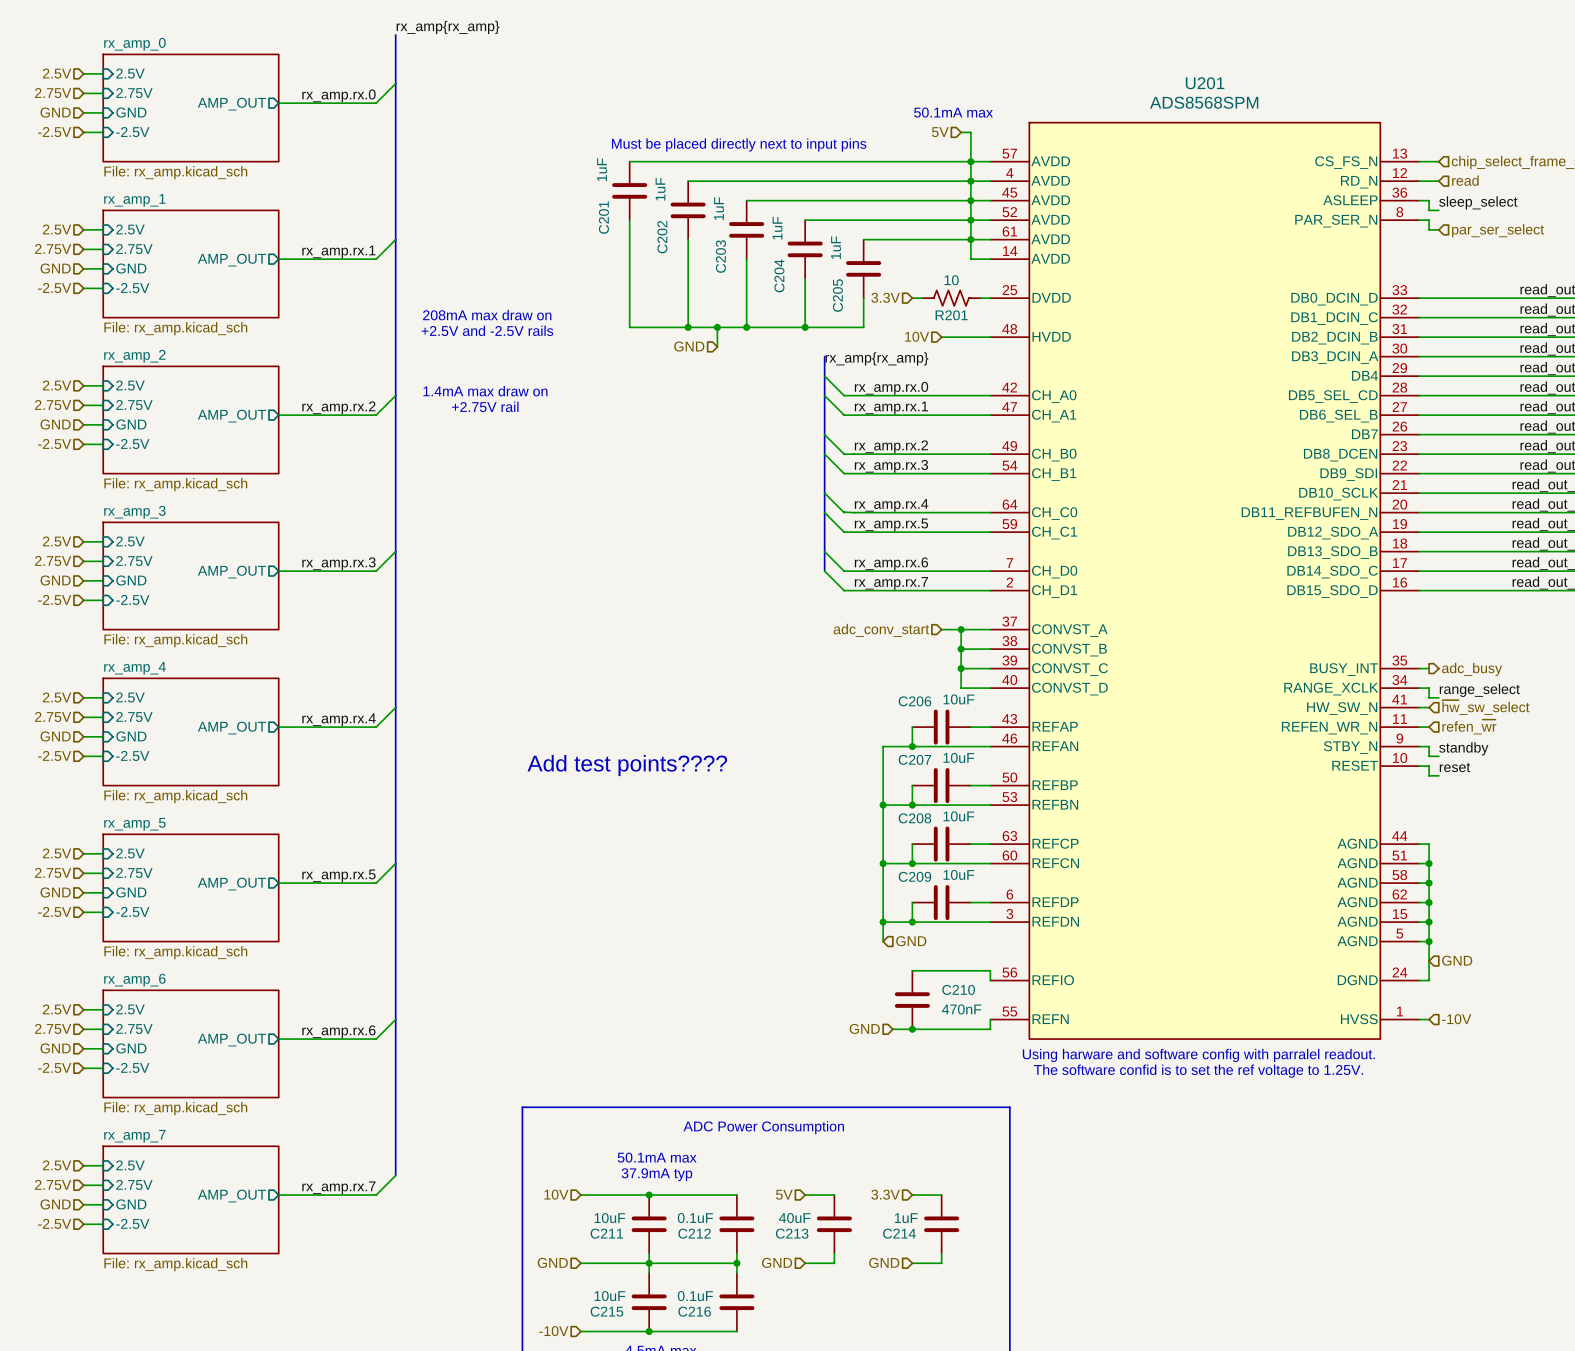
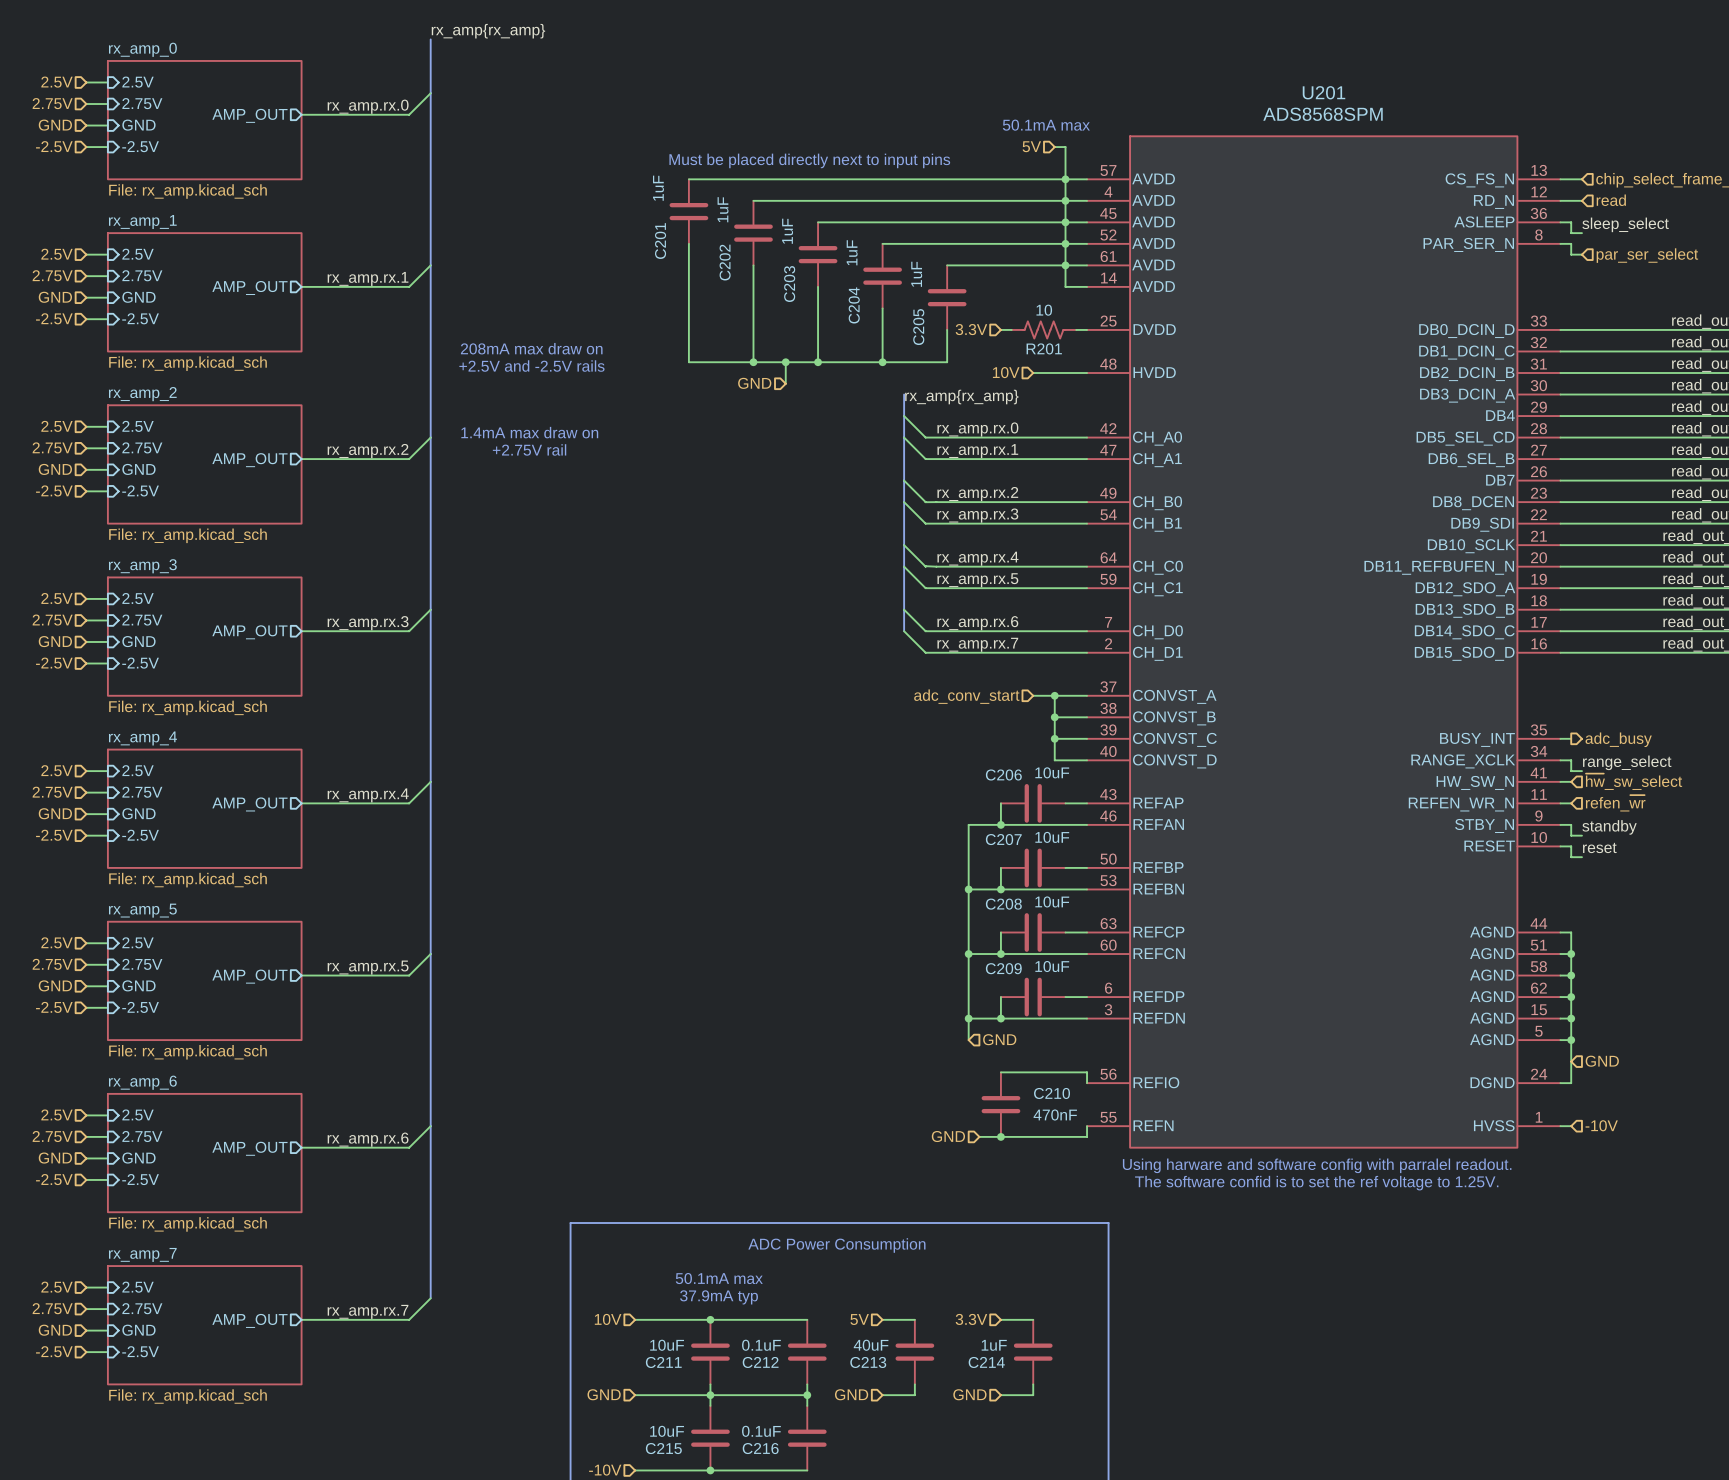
text: Add test points???? (627, 765) -> none

